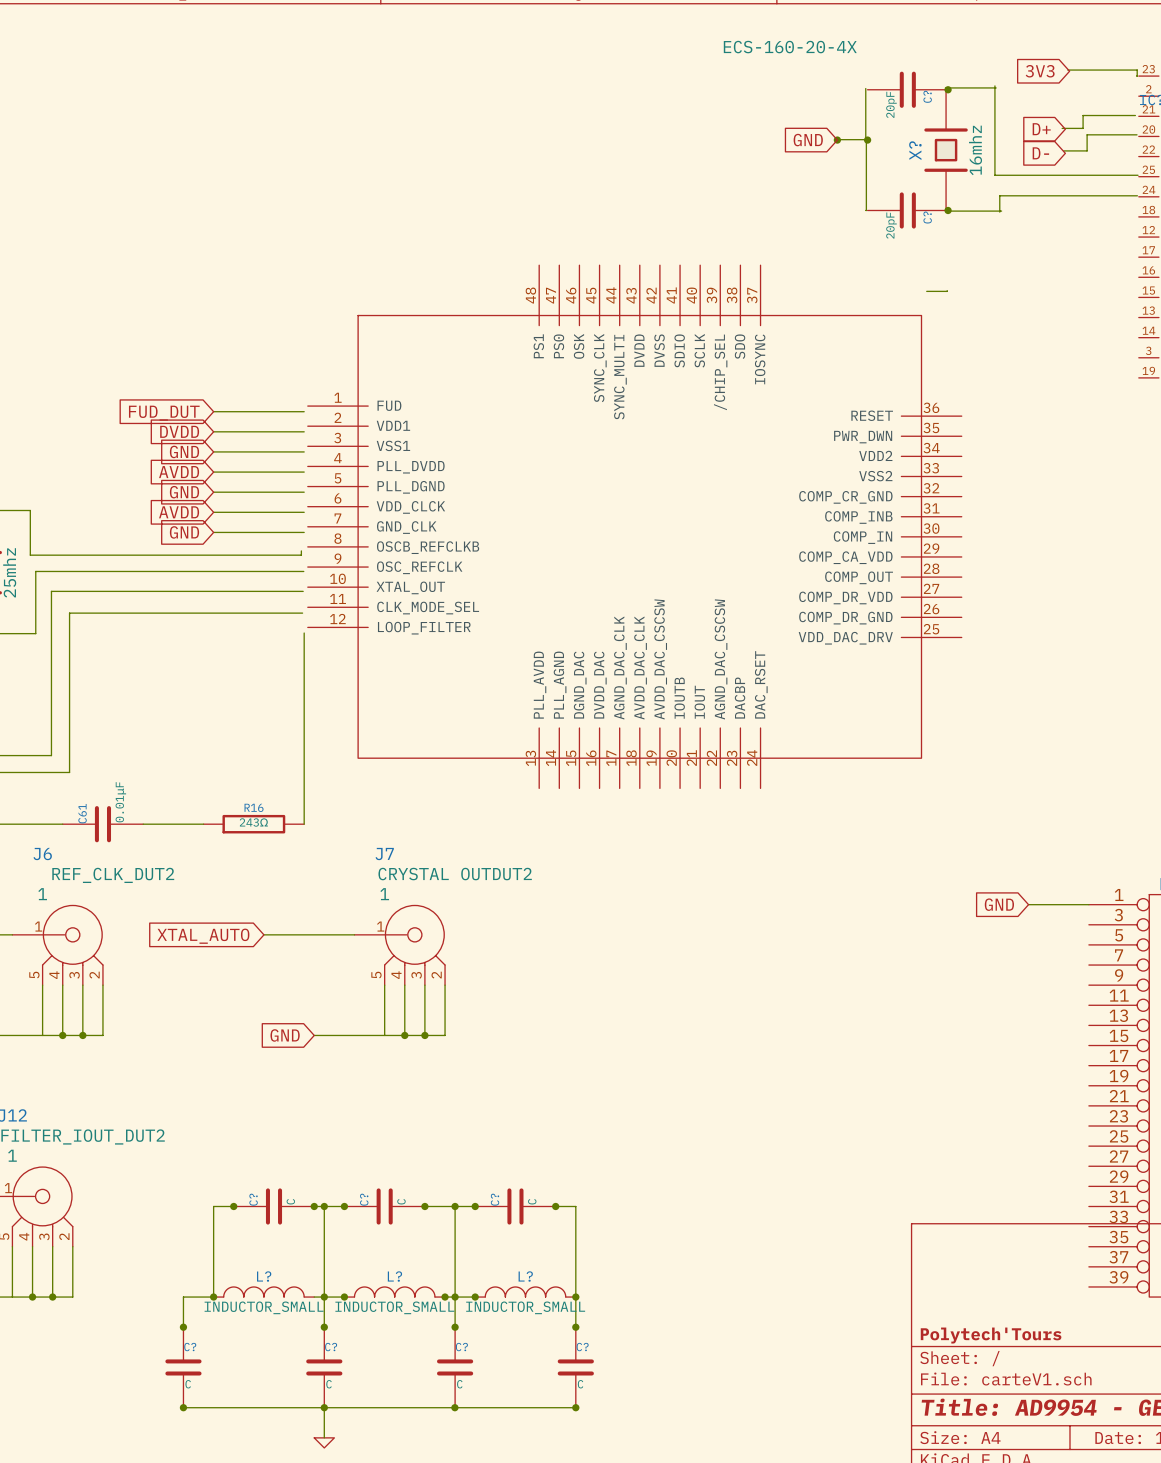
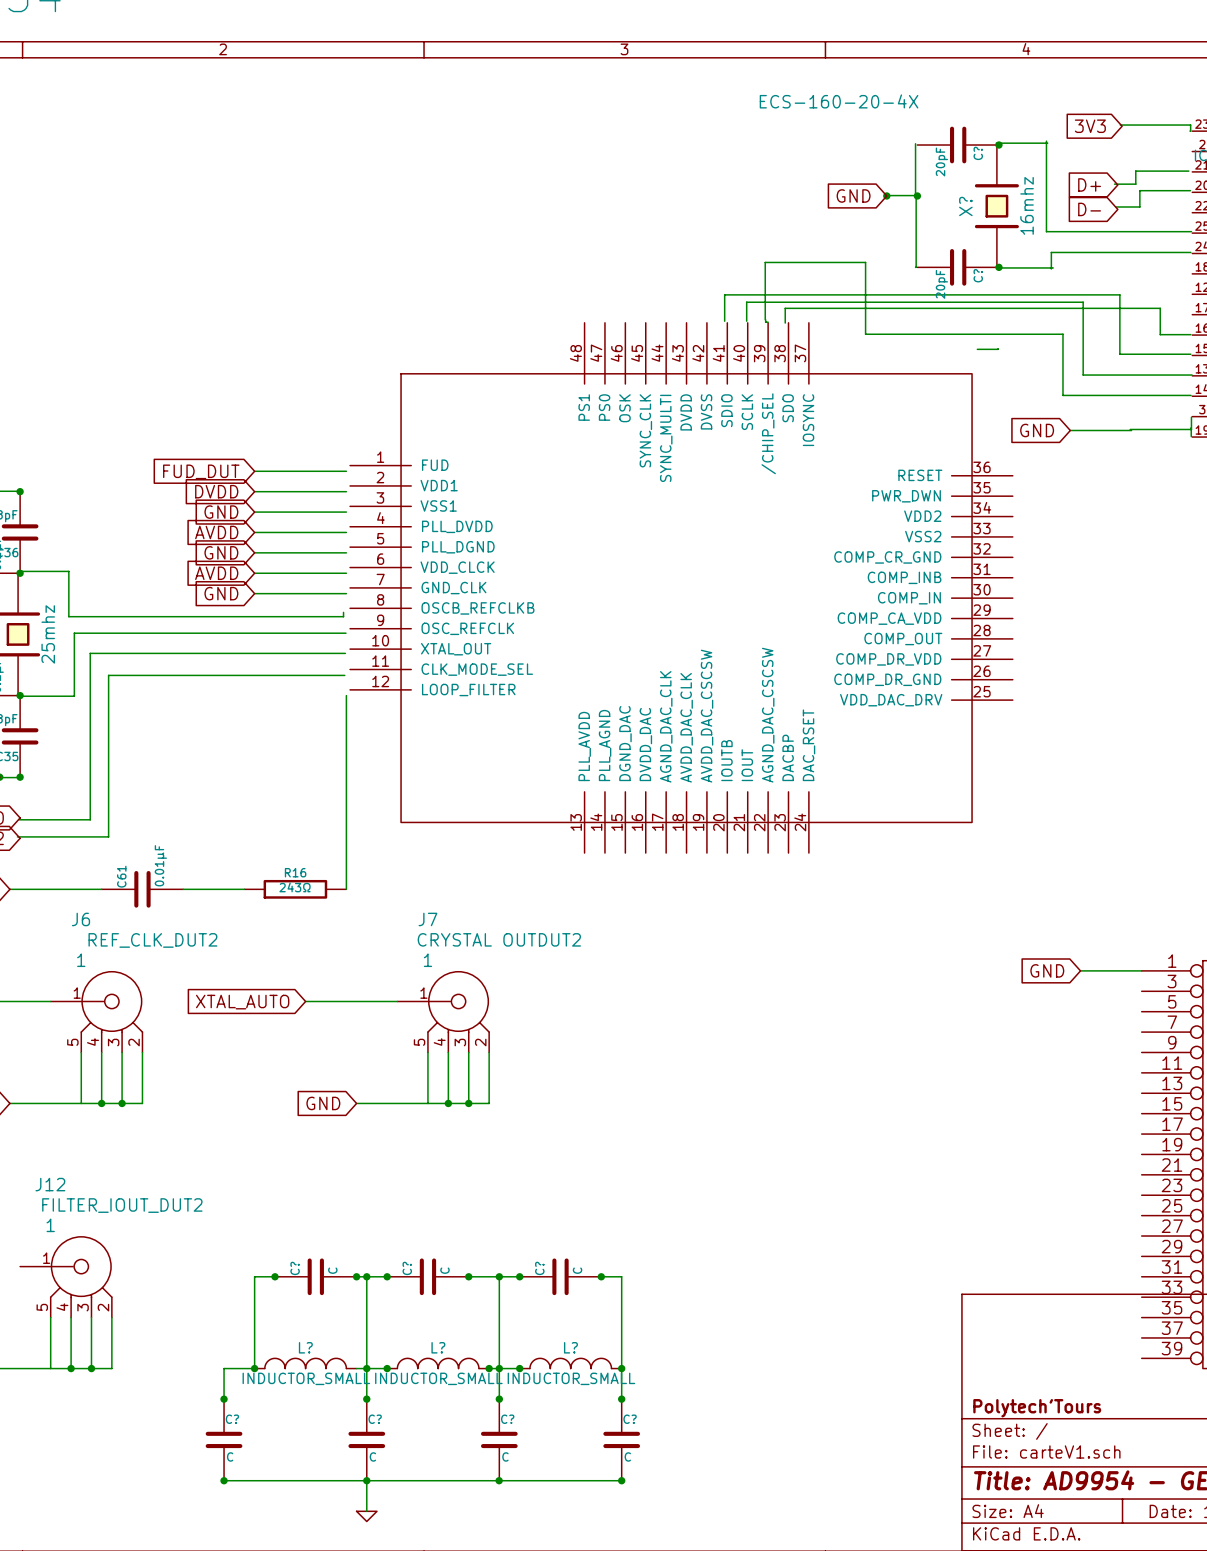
wire: none -> (765, 319) (765, 262) (865, 262) (865, 334) (1062, 334) (1062, 395) (1191, 395)
wire: none -> (765, 319) (765, 322) (768, 322)
wire: none -> (724, 321) (724, 294) (1119, 294) (1119, 354) (1190, 354)
wire: none -> (746, 321) (746, 302) (1083, 302) (1083, 375) (1192, 375)
wire: none -> (785, 323) (785, 308) (1160, 308) (1160, 334) (1190, 334)
wire: none -> (1191, 417) (1191, 429) (1130, 429)
wire: none -> (1190, 428) (1191, 436)
global label: none -> GND (1037, 430)
wire: none -> (1070, 430) (1131, 430)

